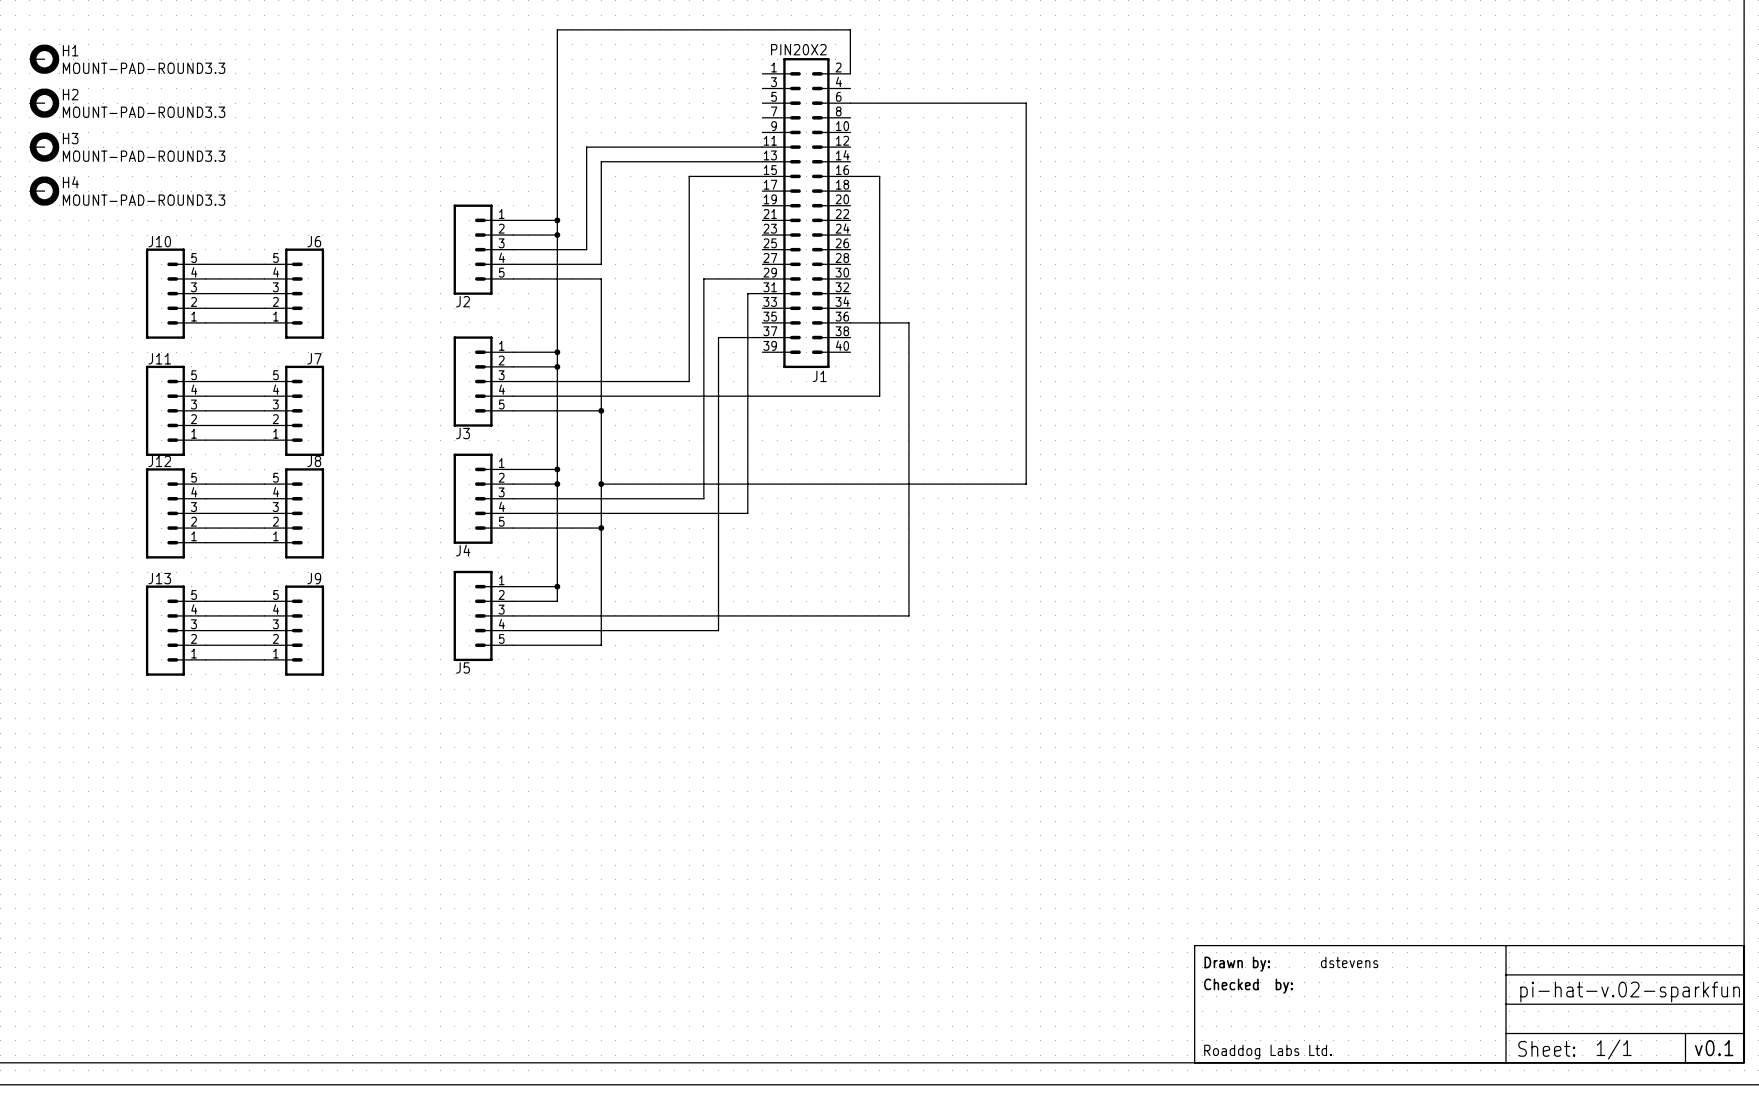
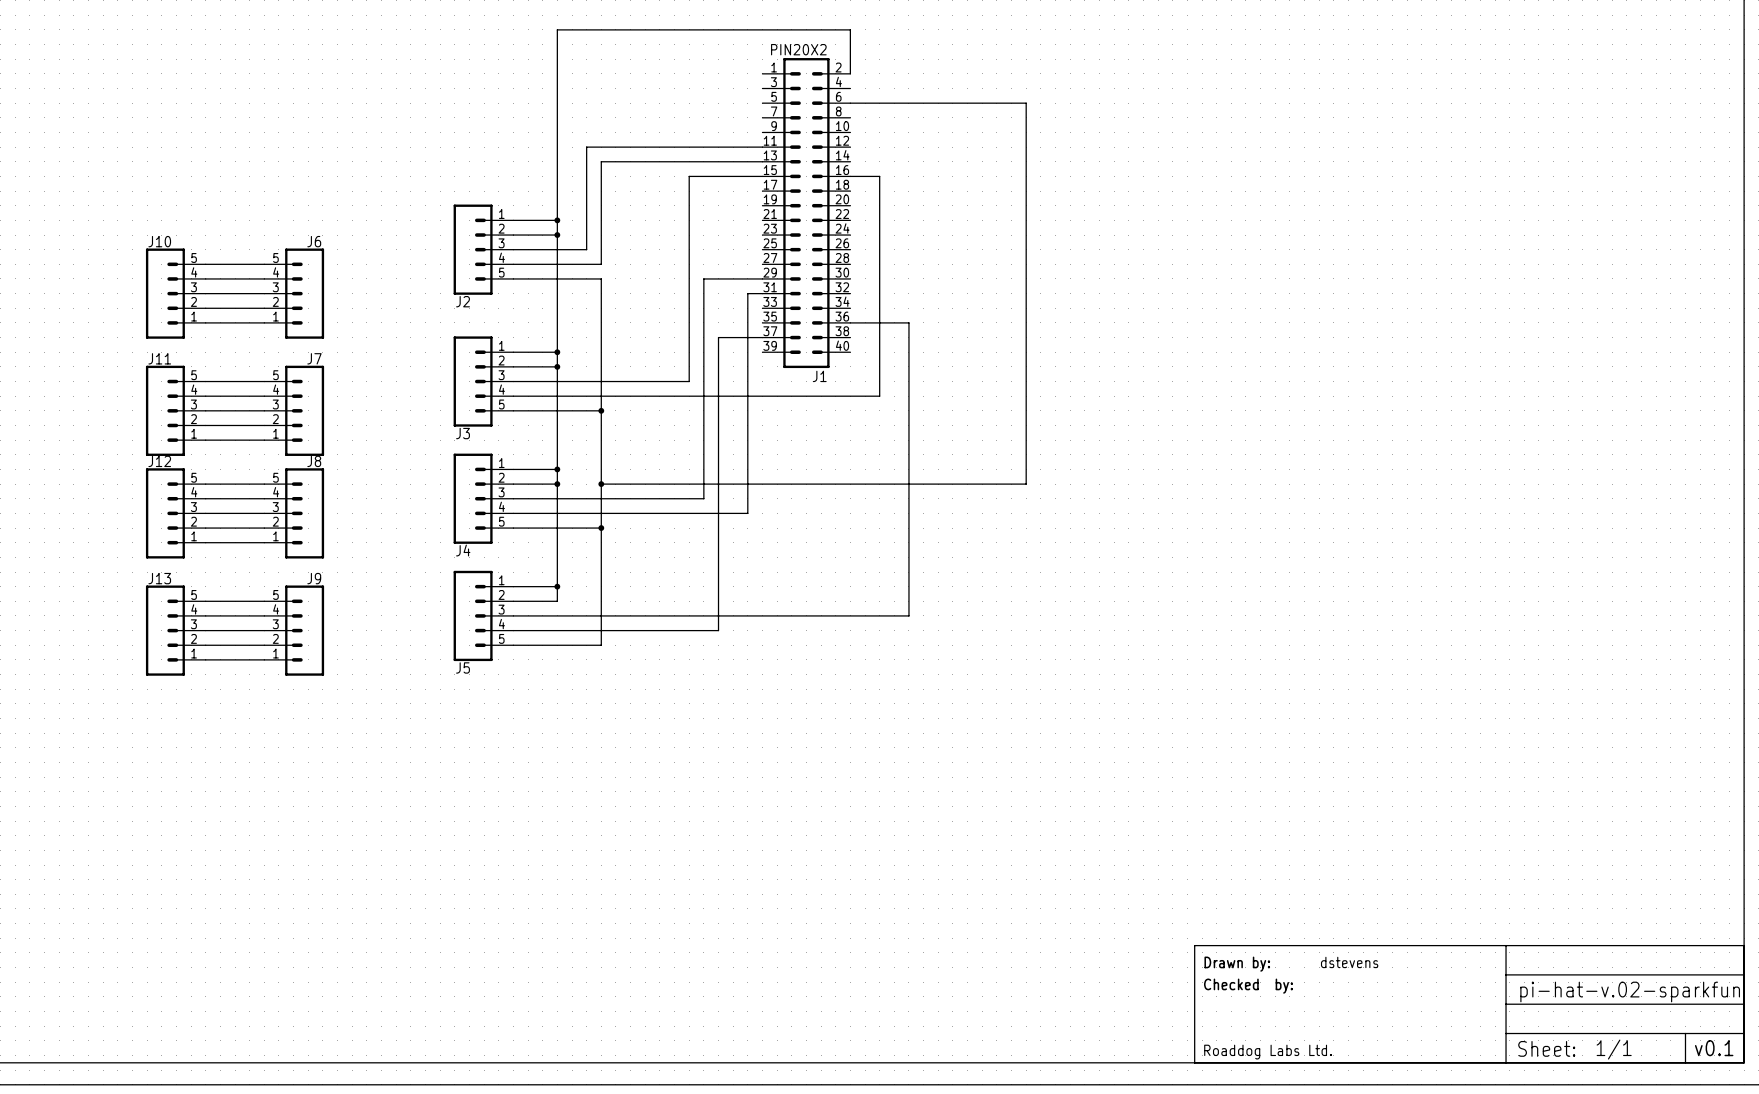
H1: MOUNT-PAD-ROUND3.3 (44, 59) -> none
H2: MOUNT-PAD-ROUND3.3 (44, 103) -> none
H3: MOUNT-PAD-ROUND3.3 (44, 147) -> none
H4: MOUNT-PAD-ROUND3.3 (44, 191) -> none

